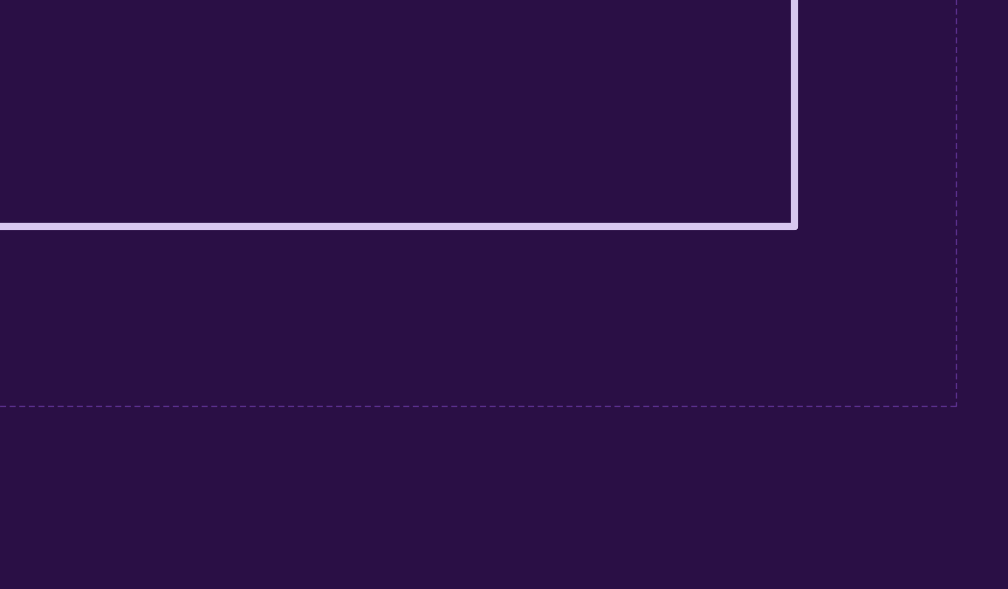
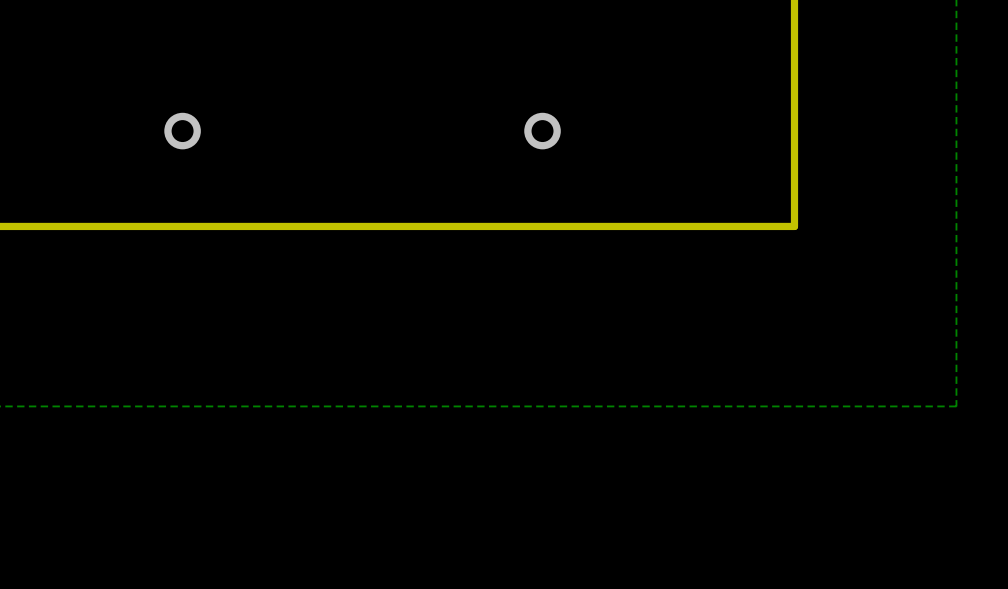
via: none -> (182, 131)
via: none -> (542, 131)

